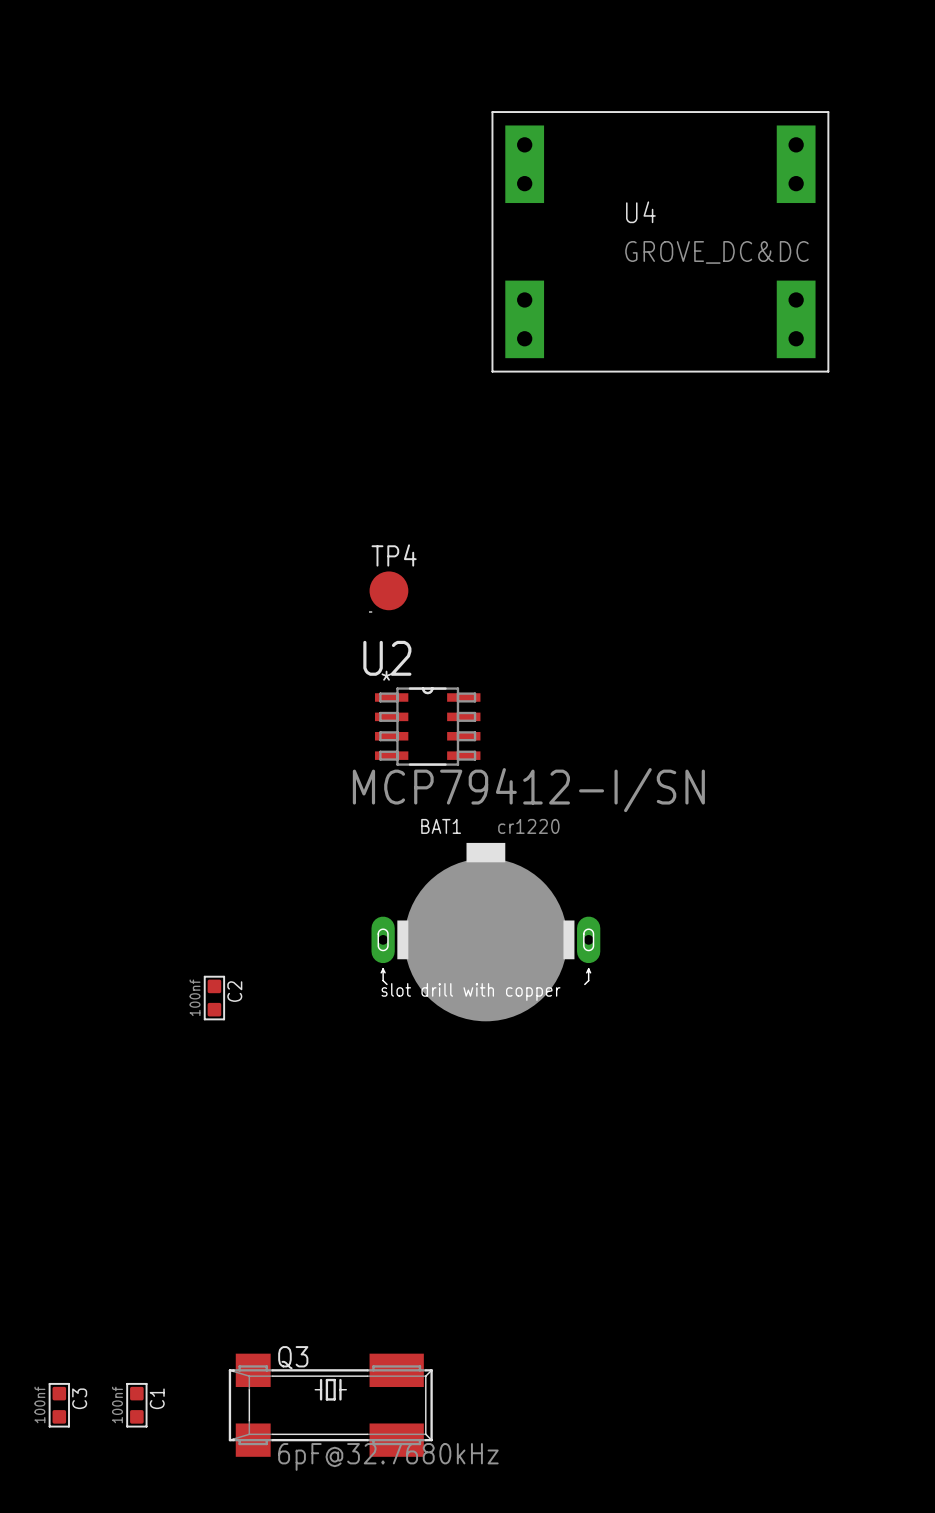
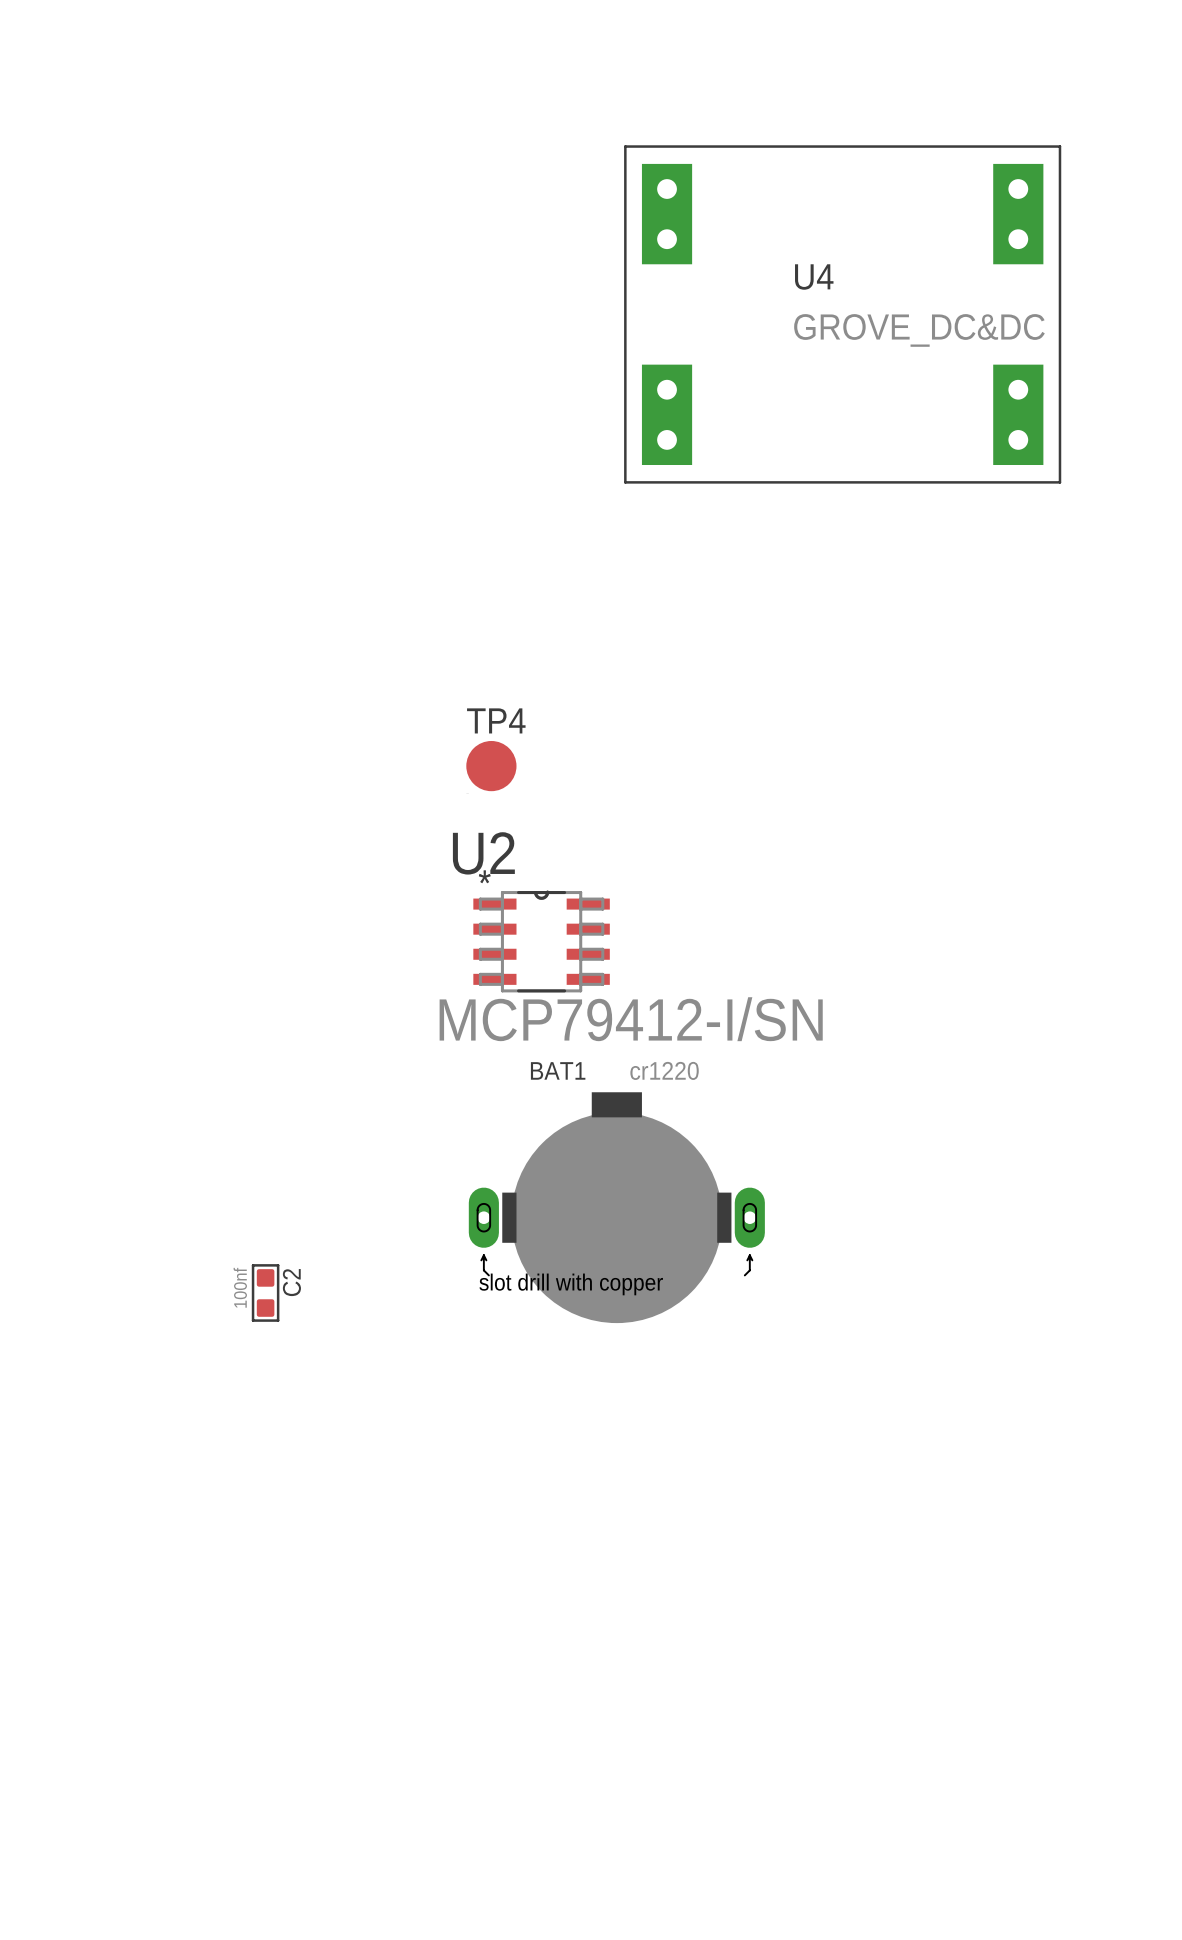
C3: 100nf (59, 1405) -> none
C1: 100nf (136, 1405) -> none
Q3: 6pF@32.7680kHz (330, 1405) -> none

